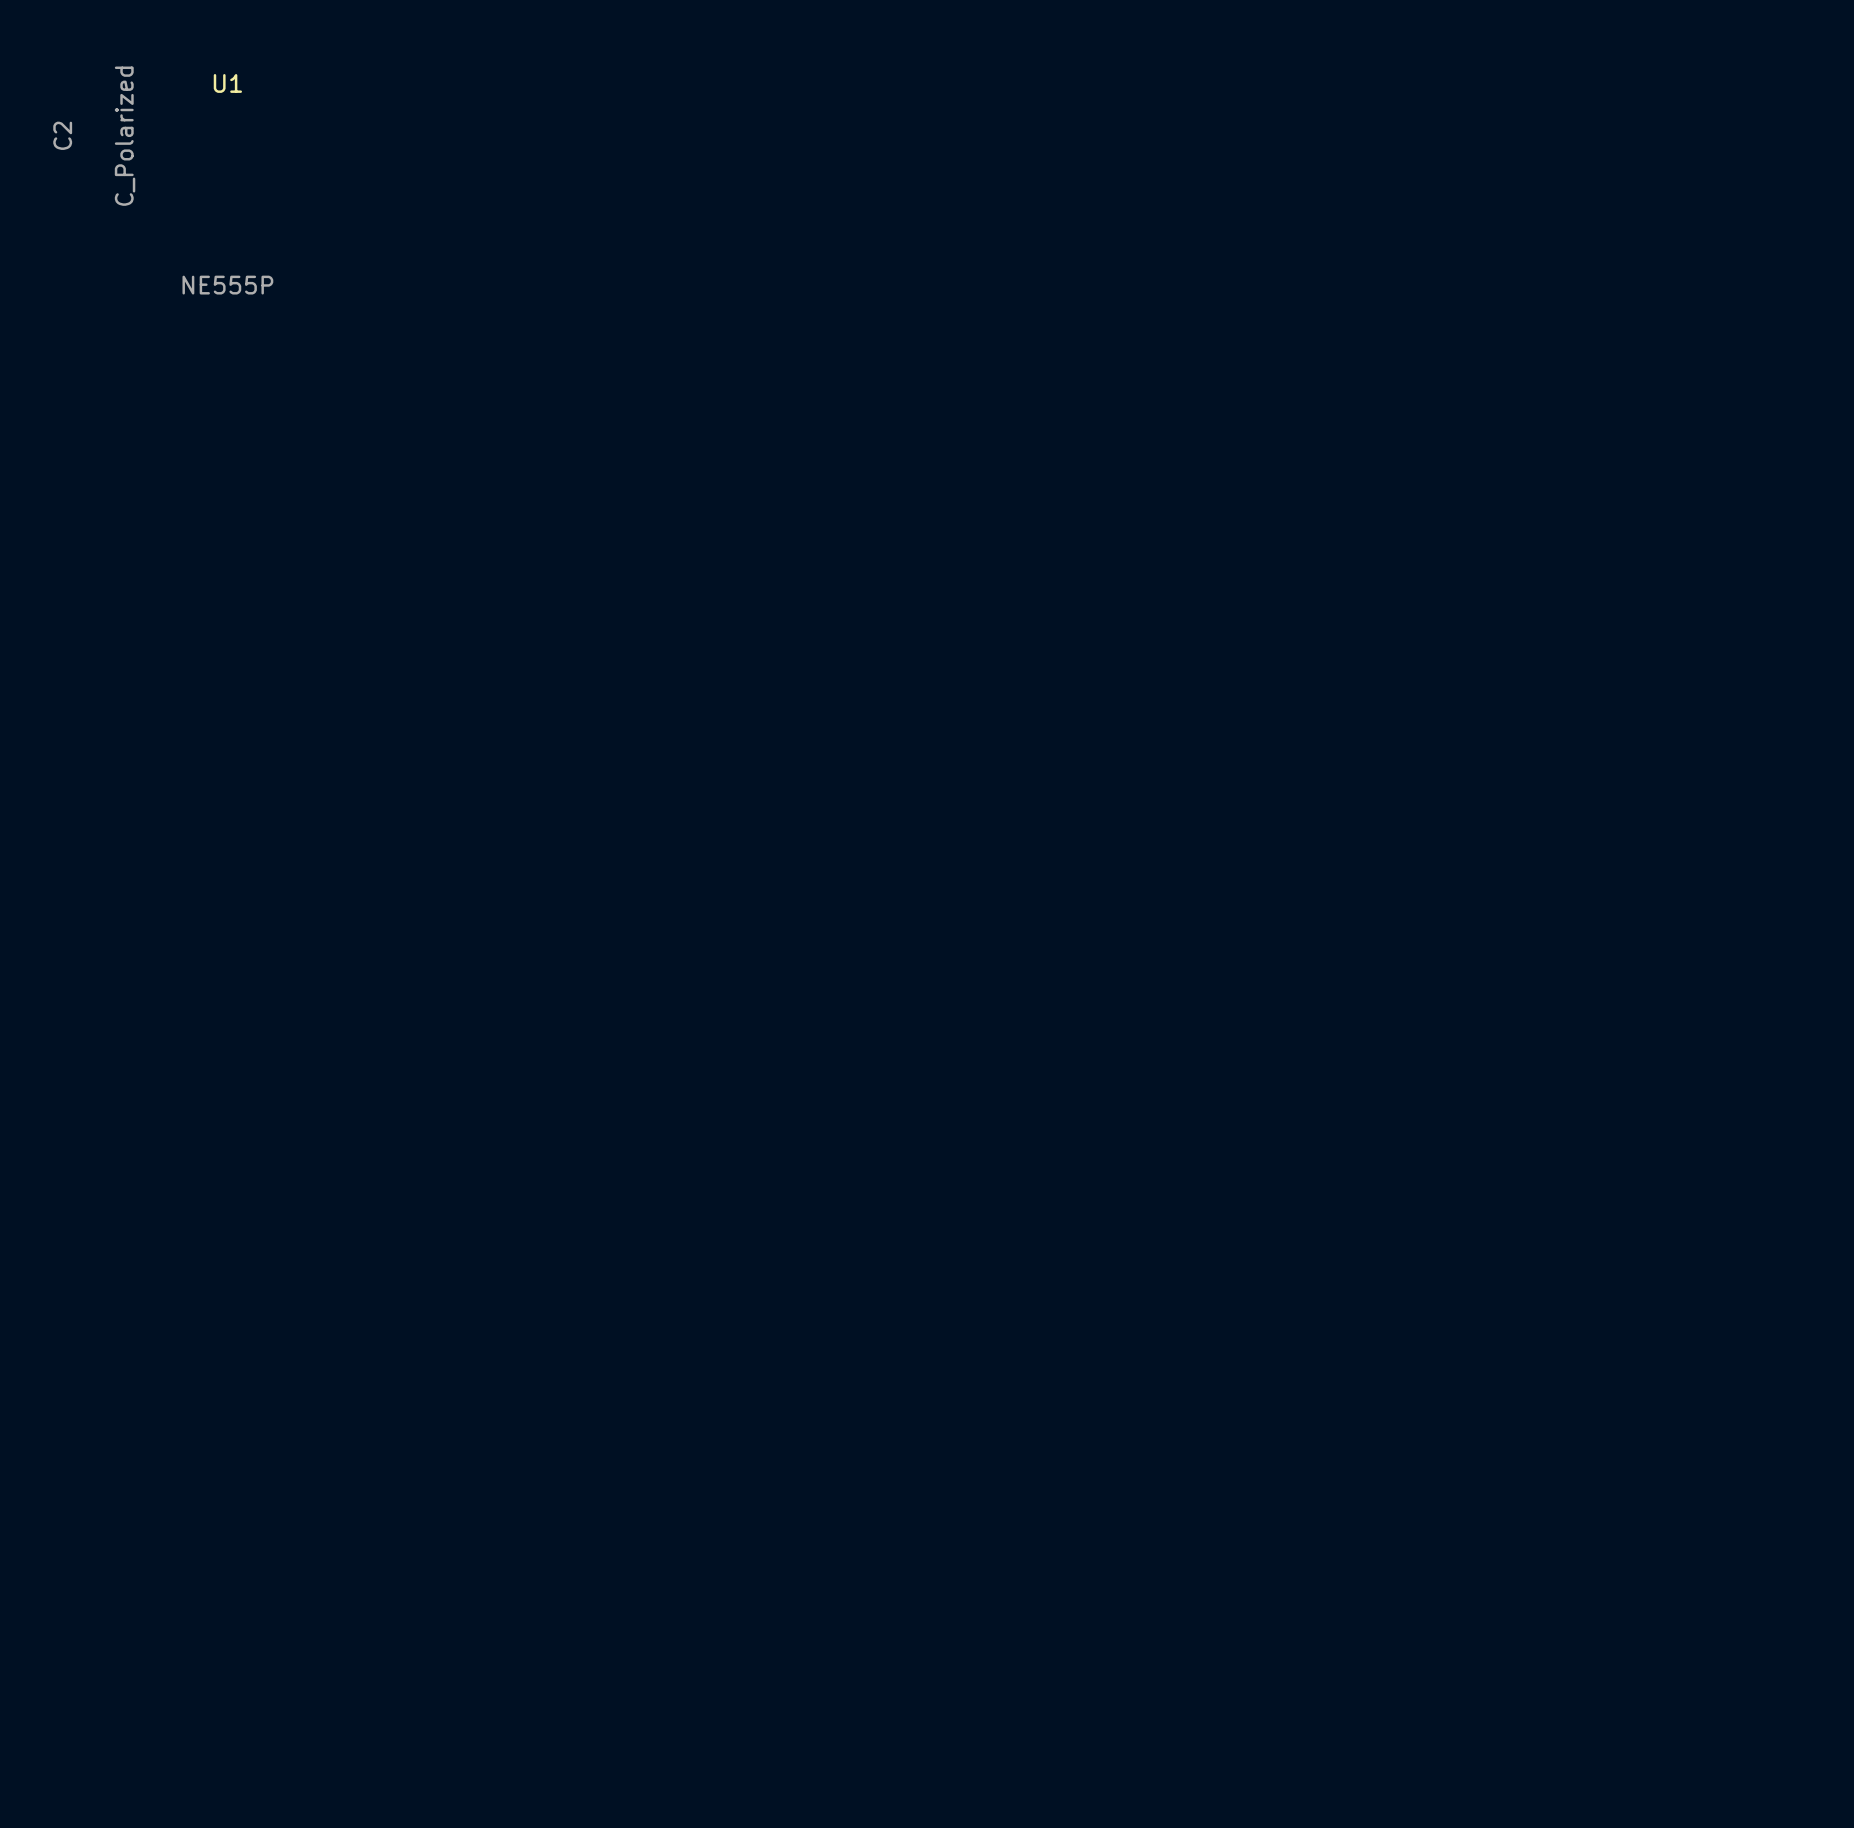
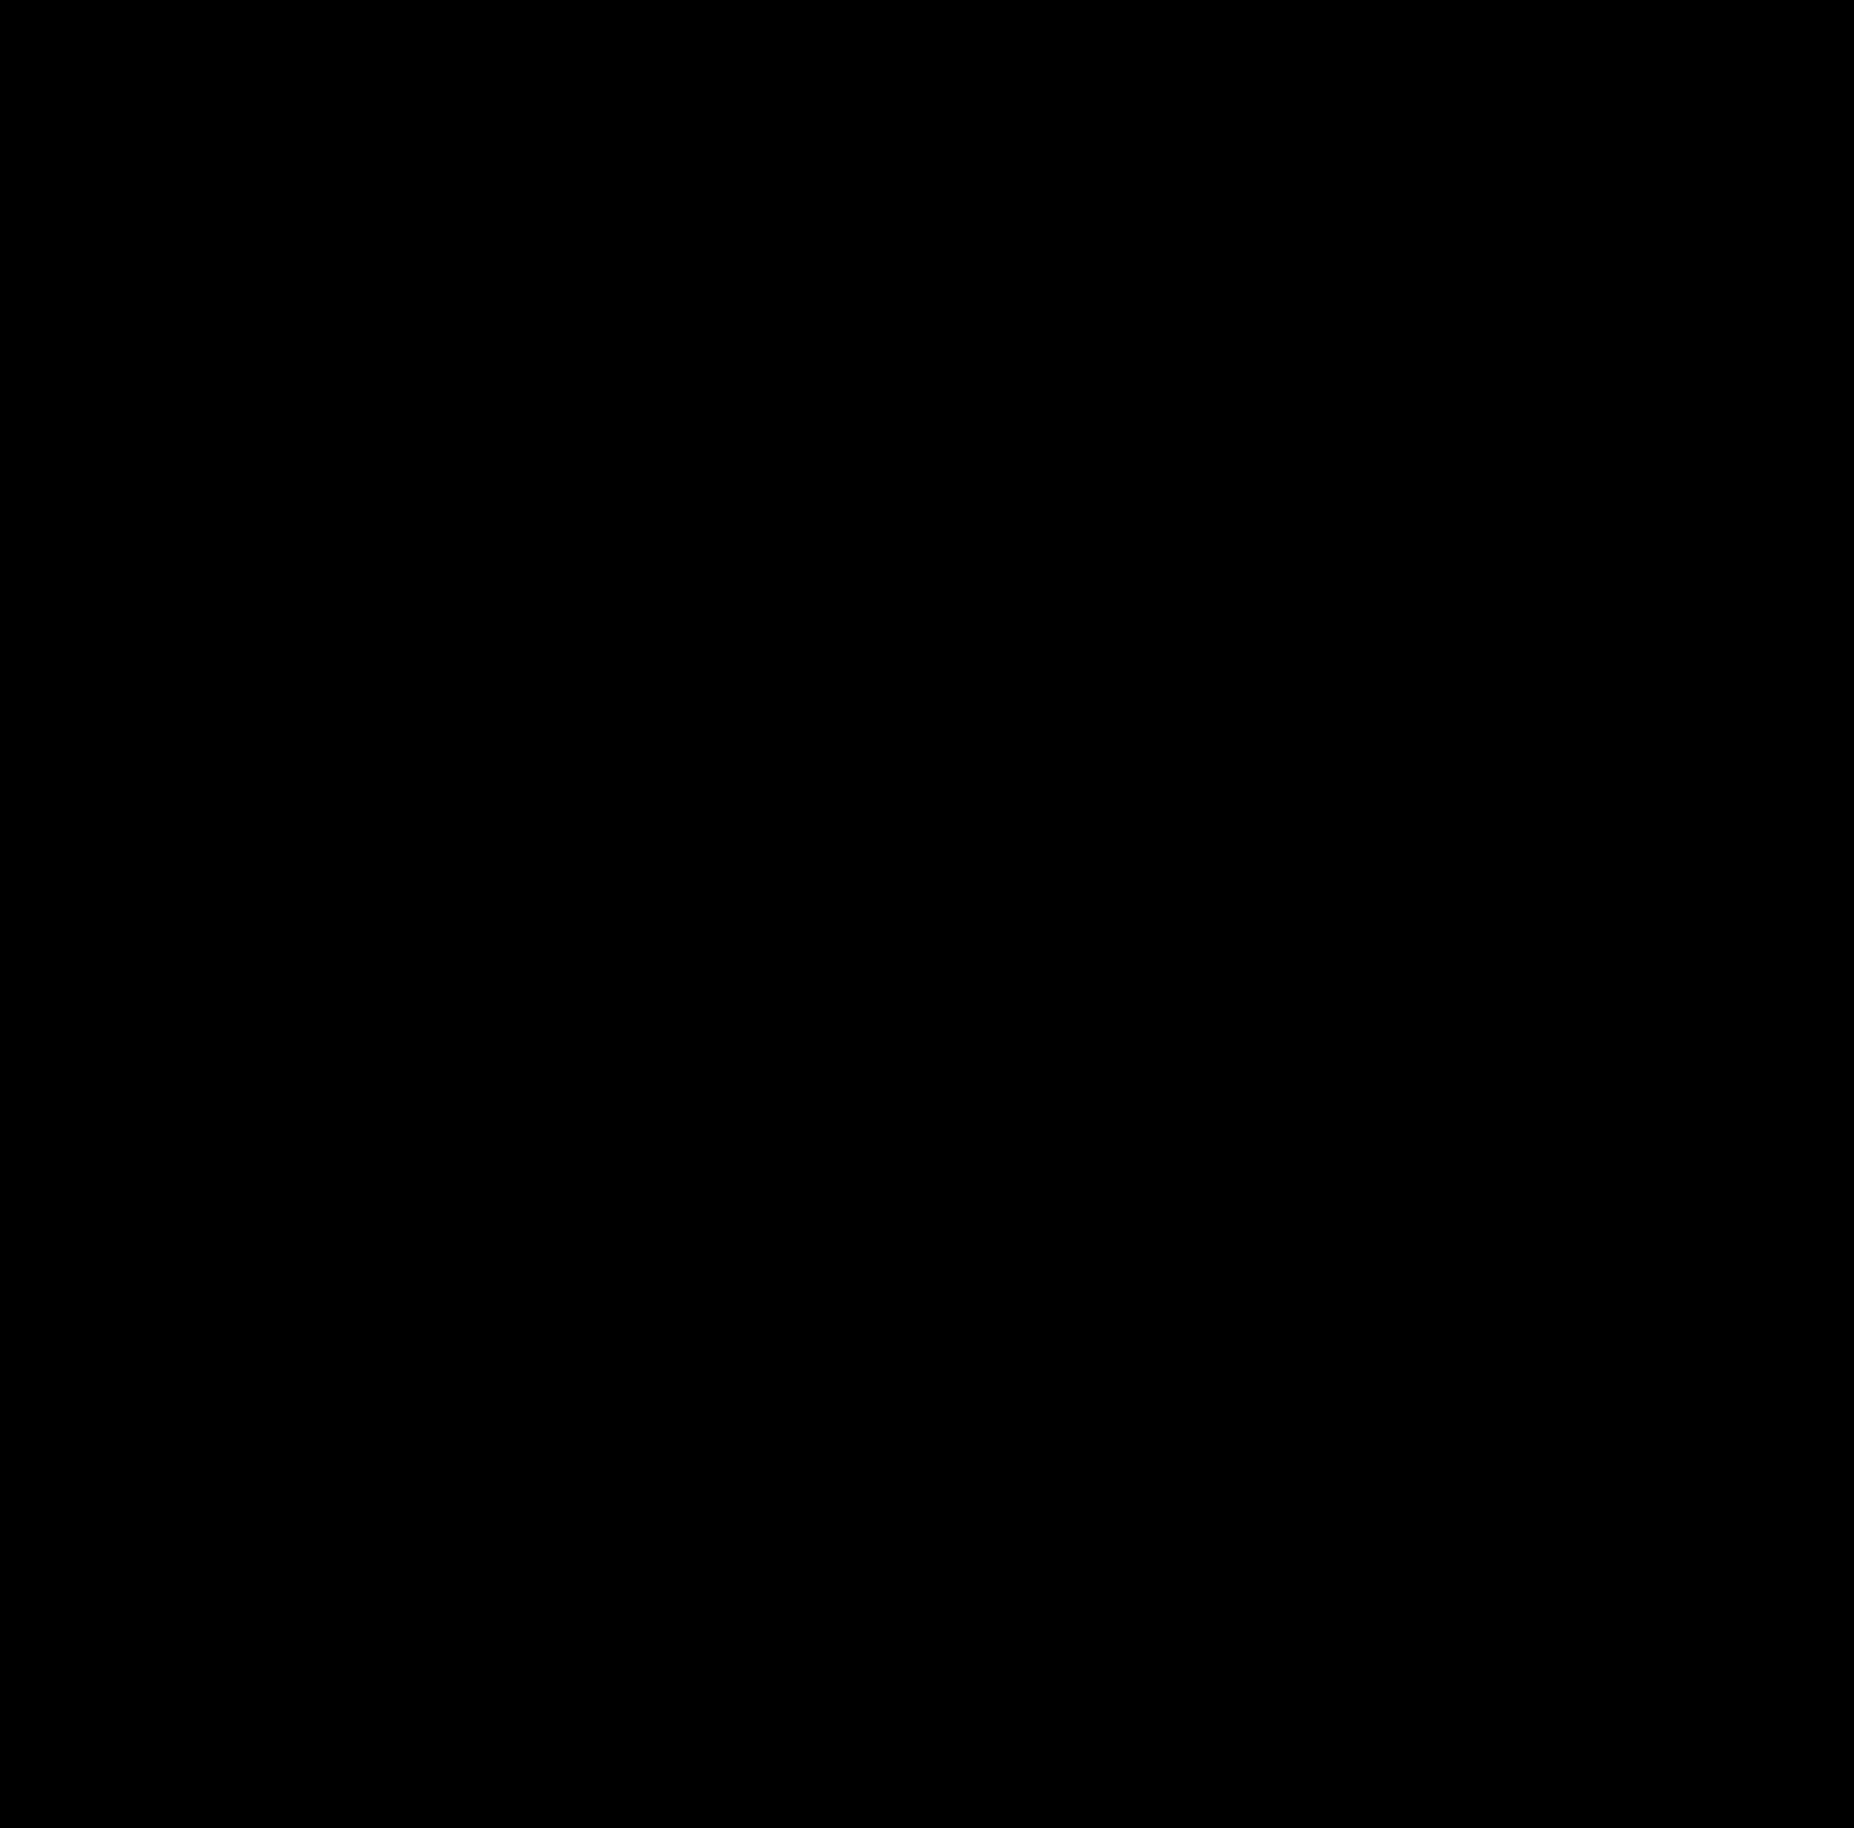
U1 name: U1 (227, 83) -> none
C2 name: C2 (62, 135) -> none
C2 value: C_Polarized (125, 136) -> none
U1 value: NE555P (227, 285) -> none

